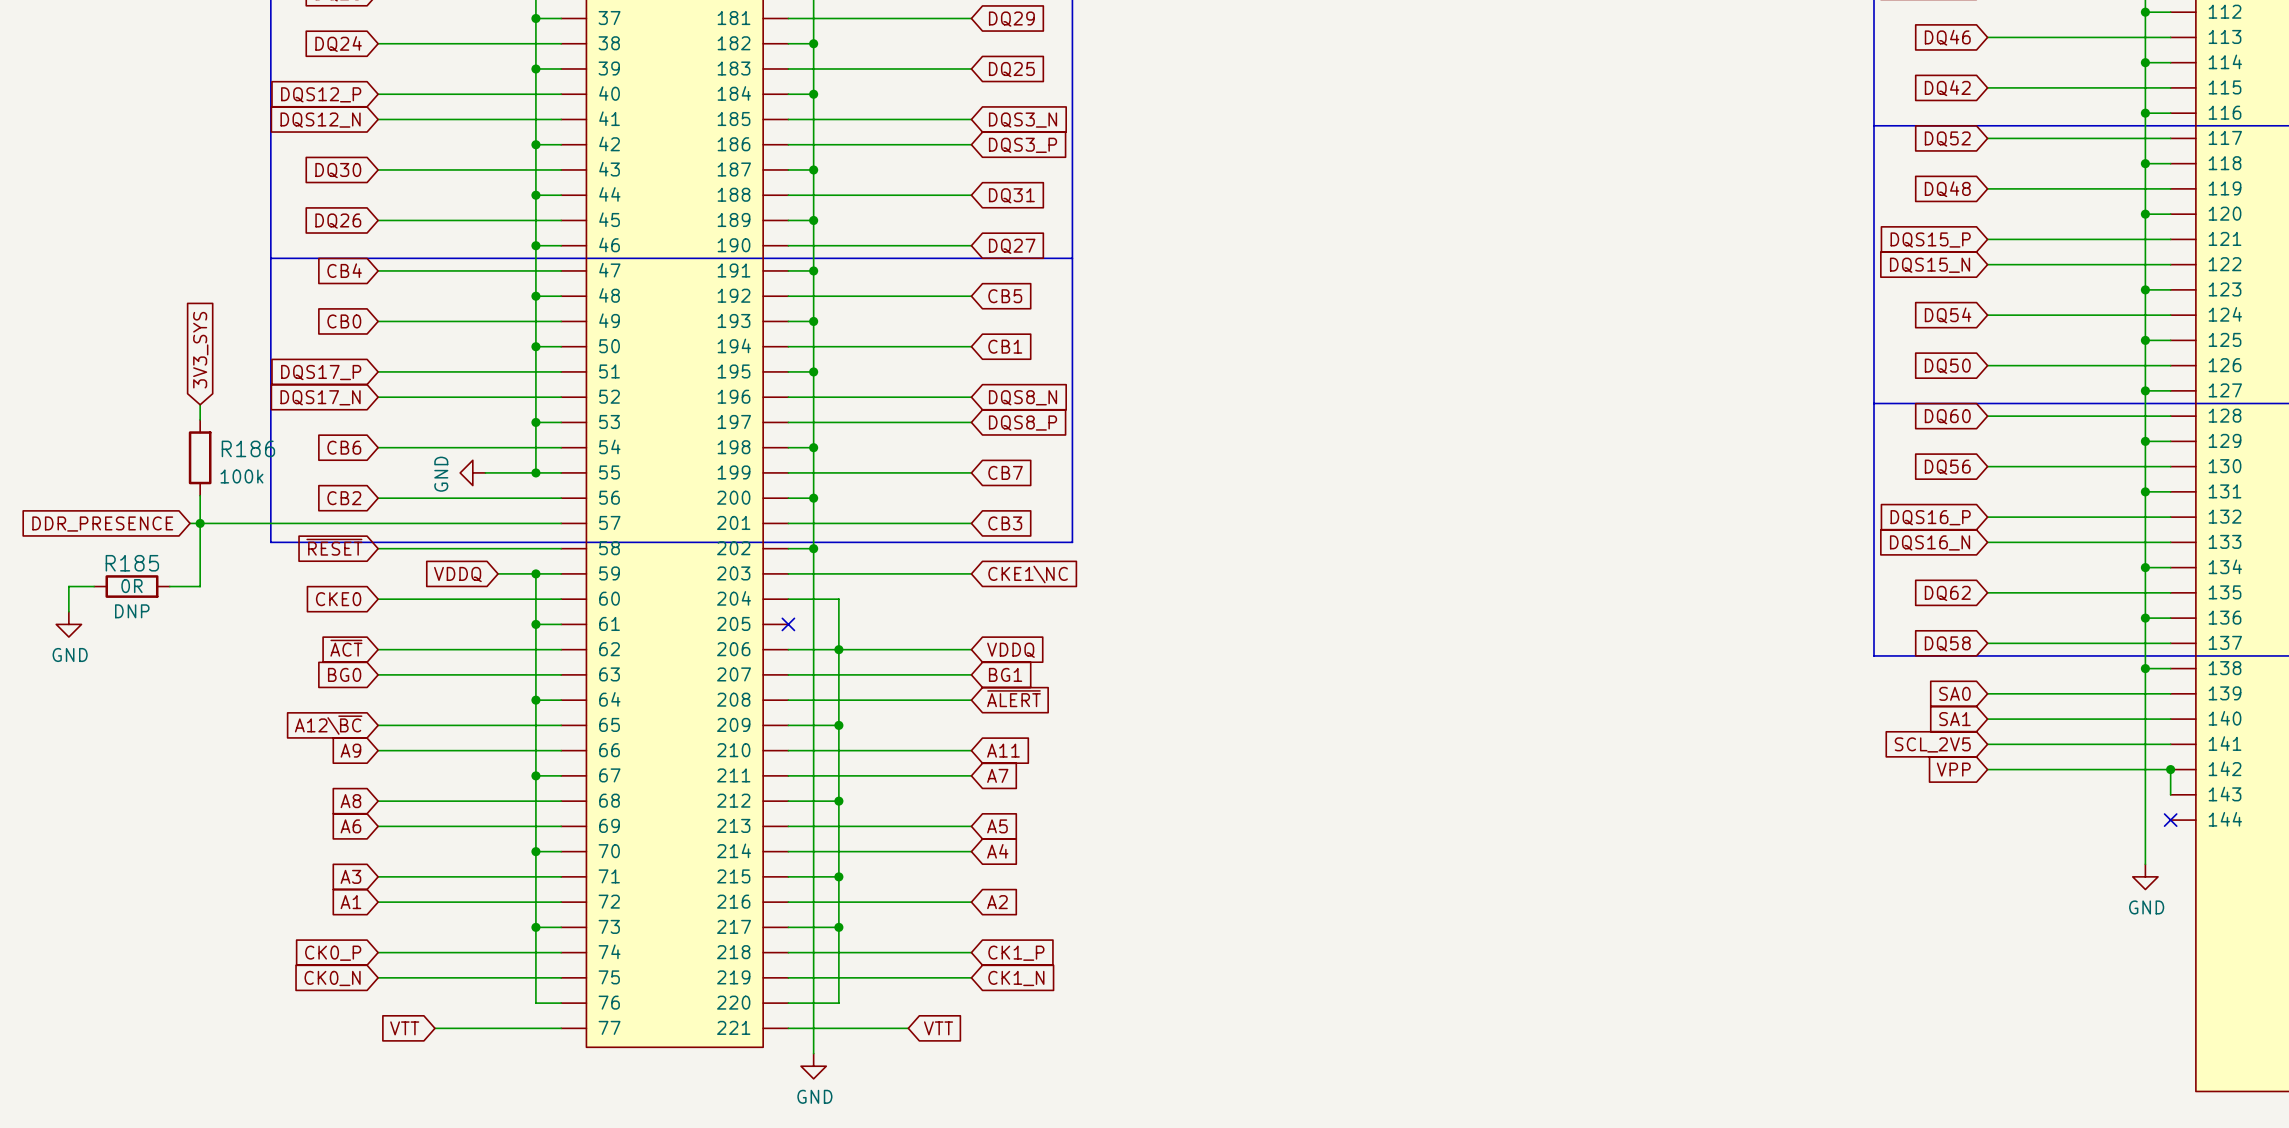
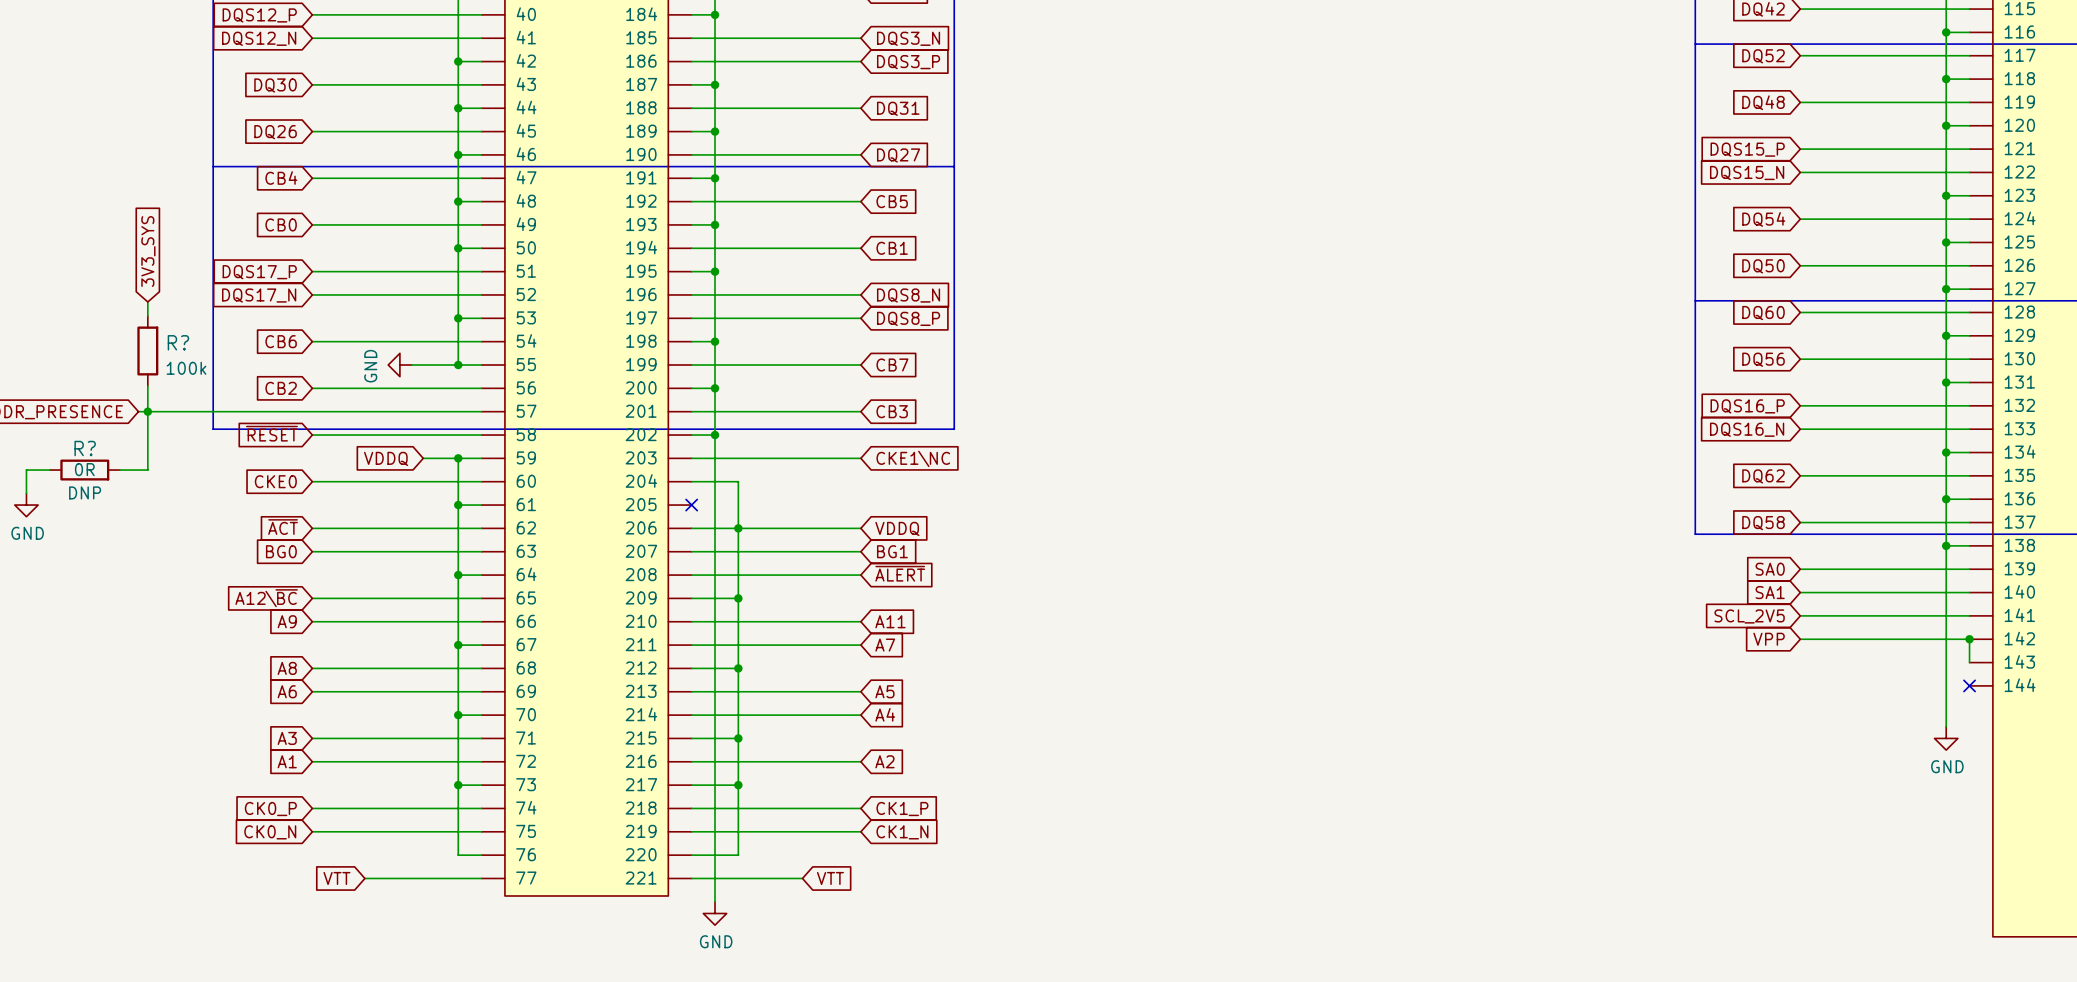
R186 name: R186 (248, 448) -> R? (178, 342)
R185 name: R185 (132, 563) -> R? (85, 448)

